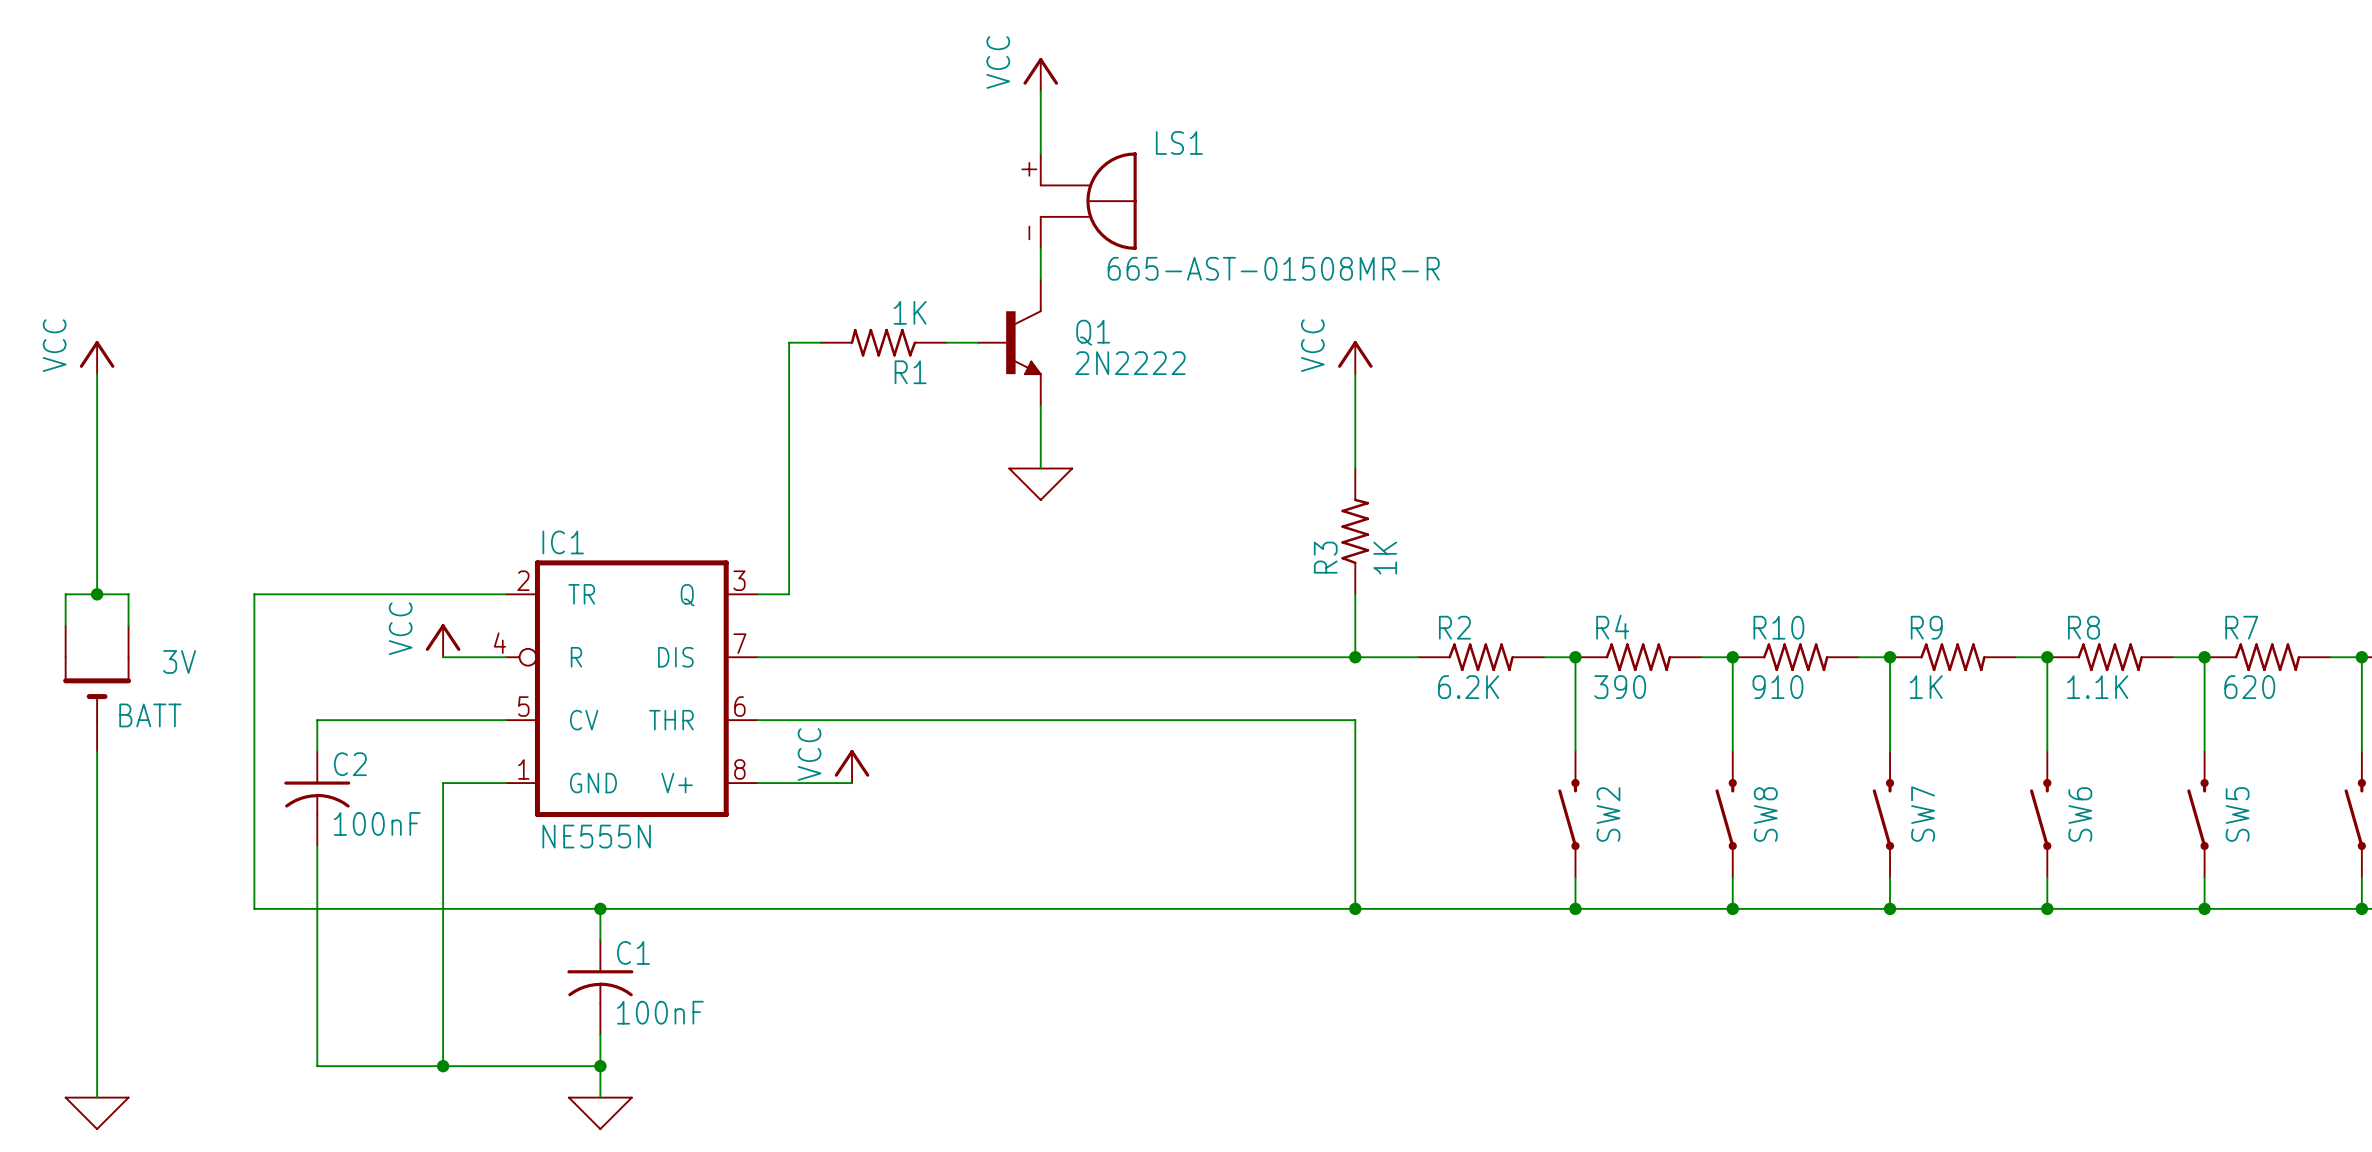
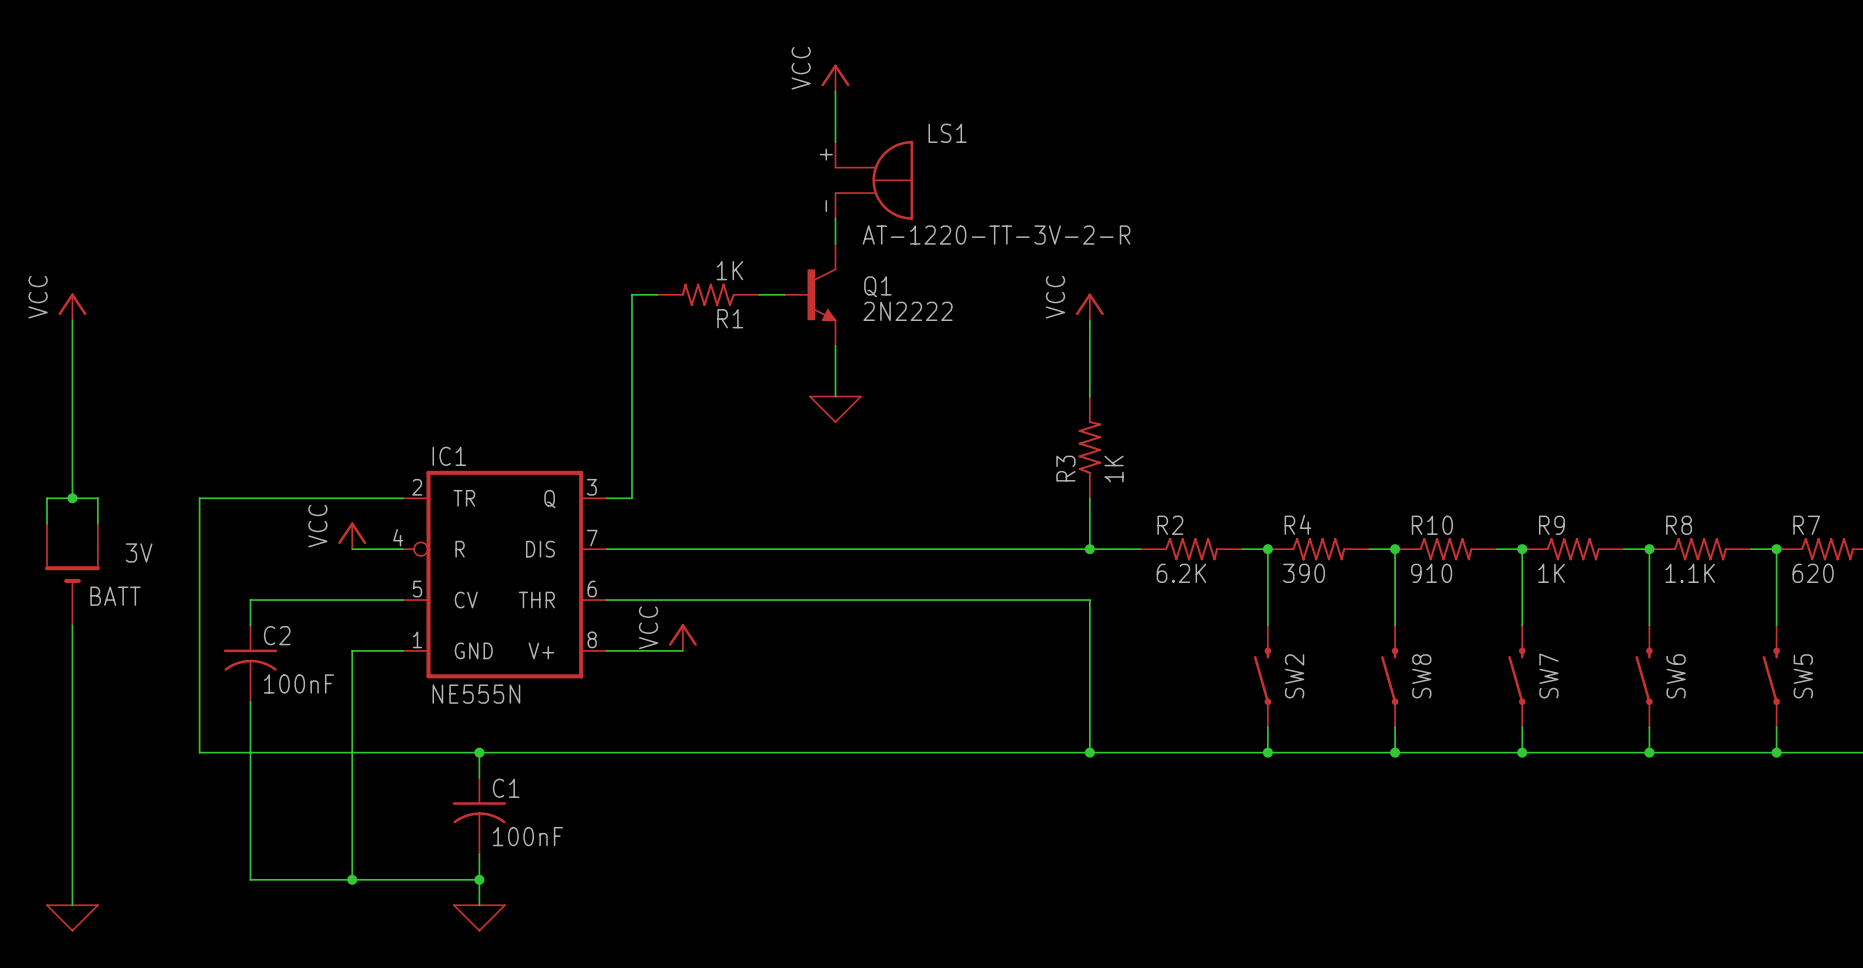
LS1 value: none -> AT-1220-TT-3V-2-R (996, 235)
LS1 text: 665-AST-01508MR-R (1273, 268) -> none

